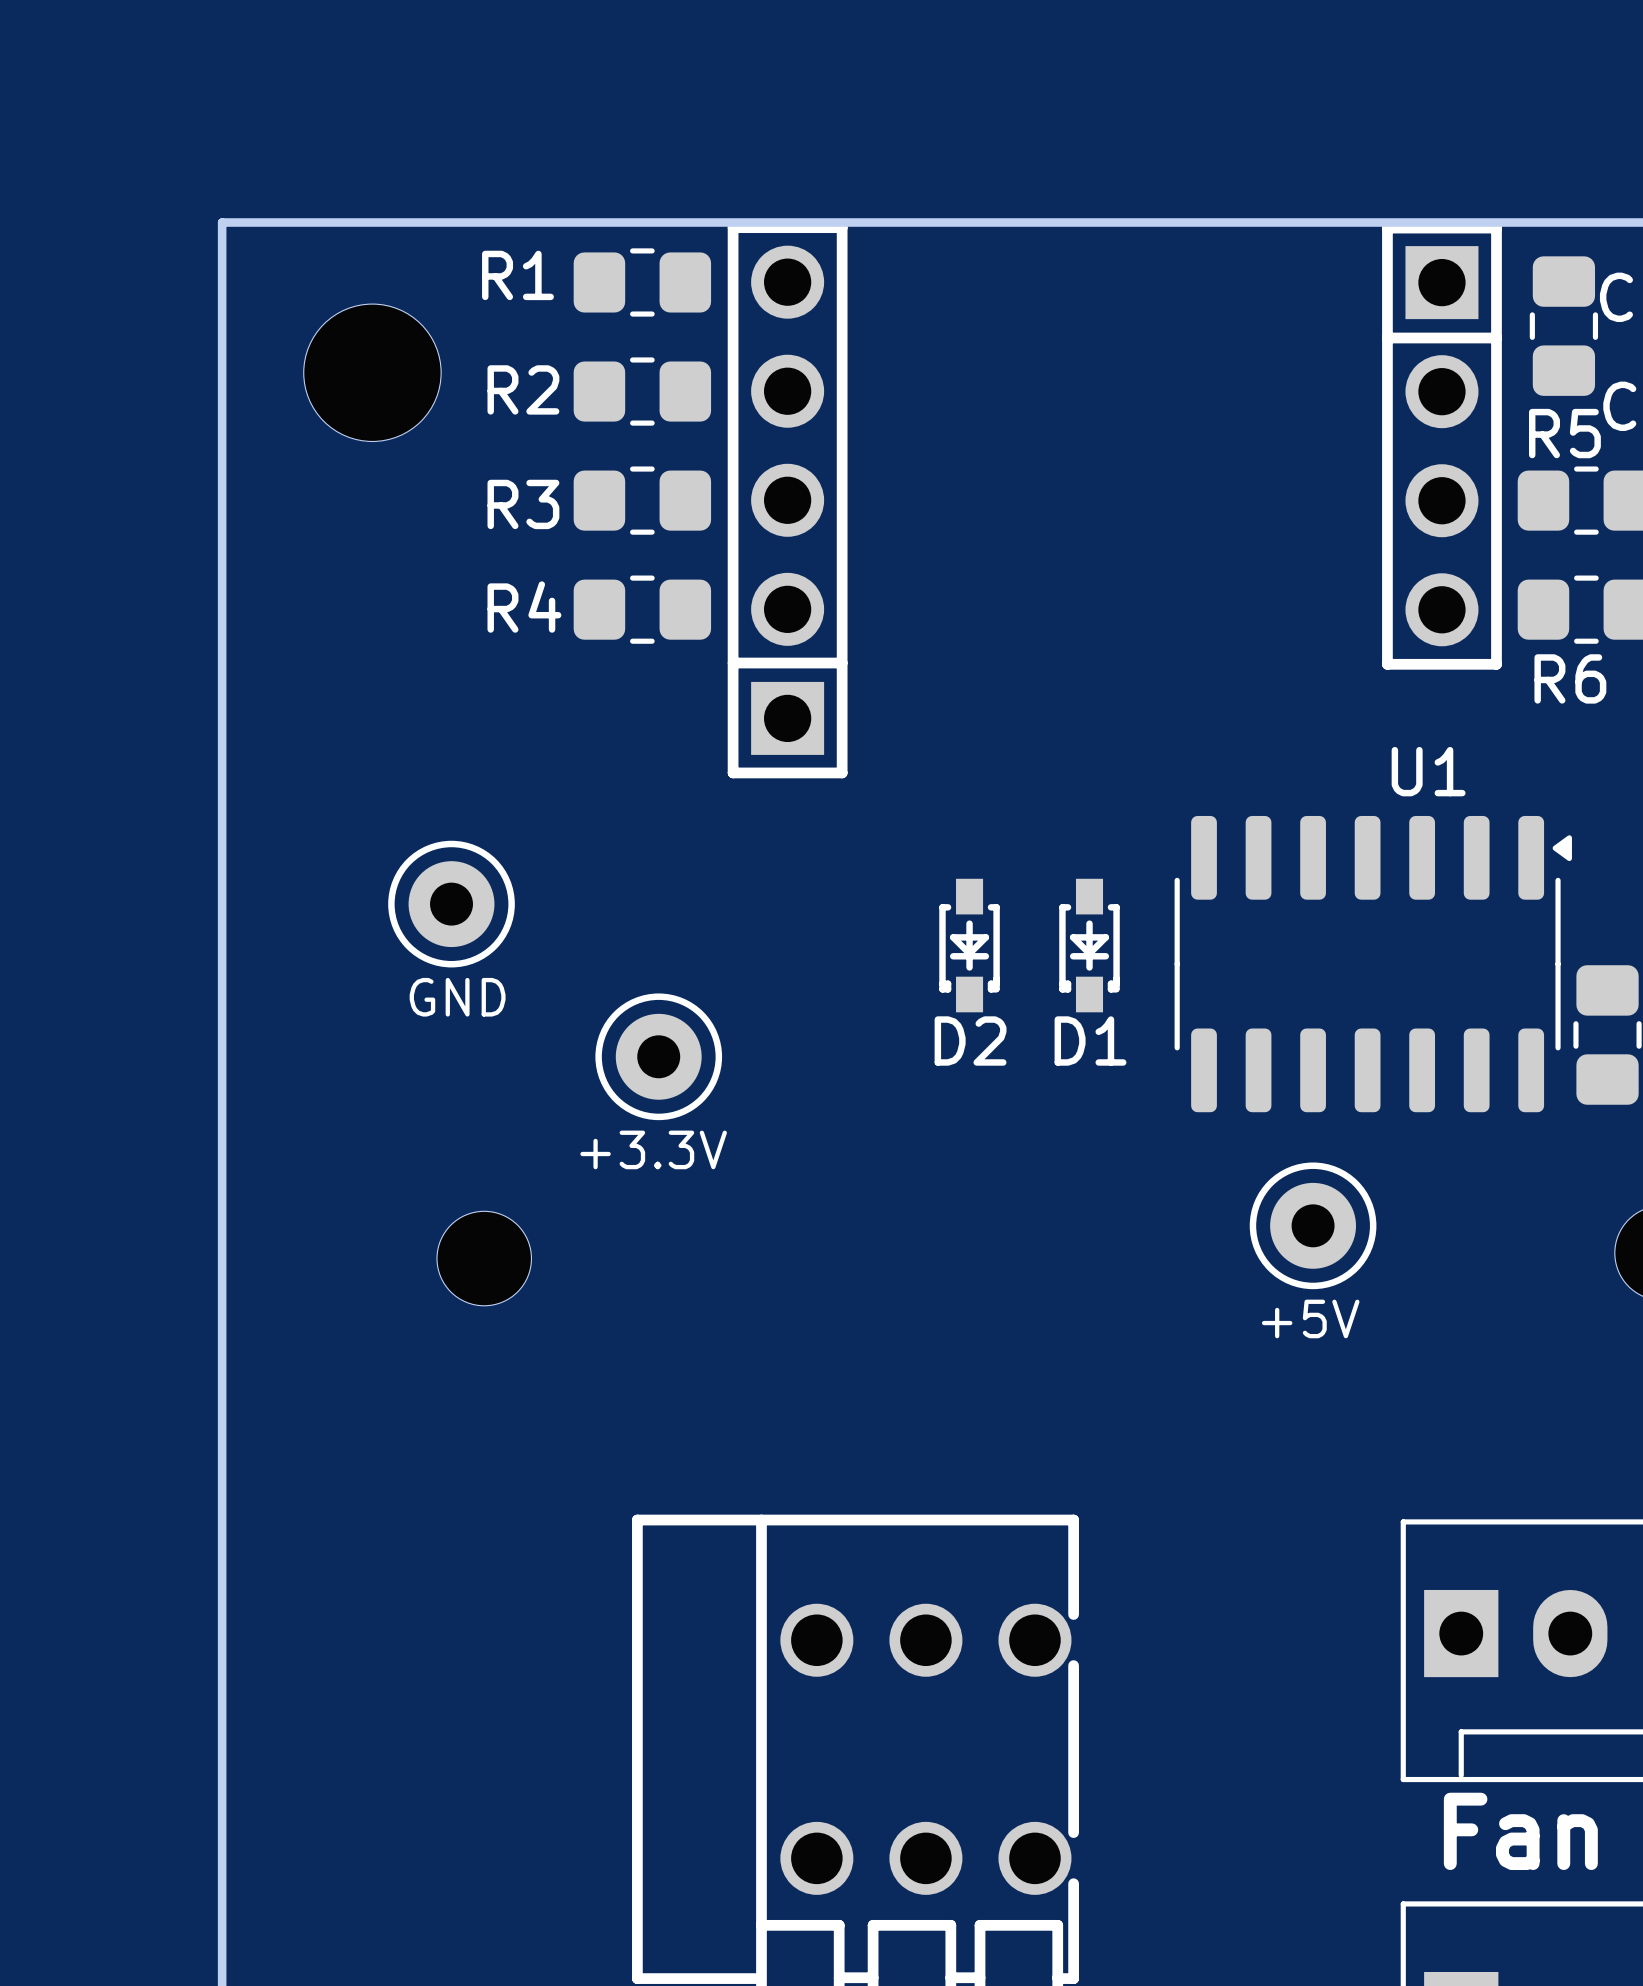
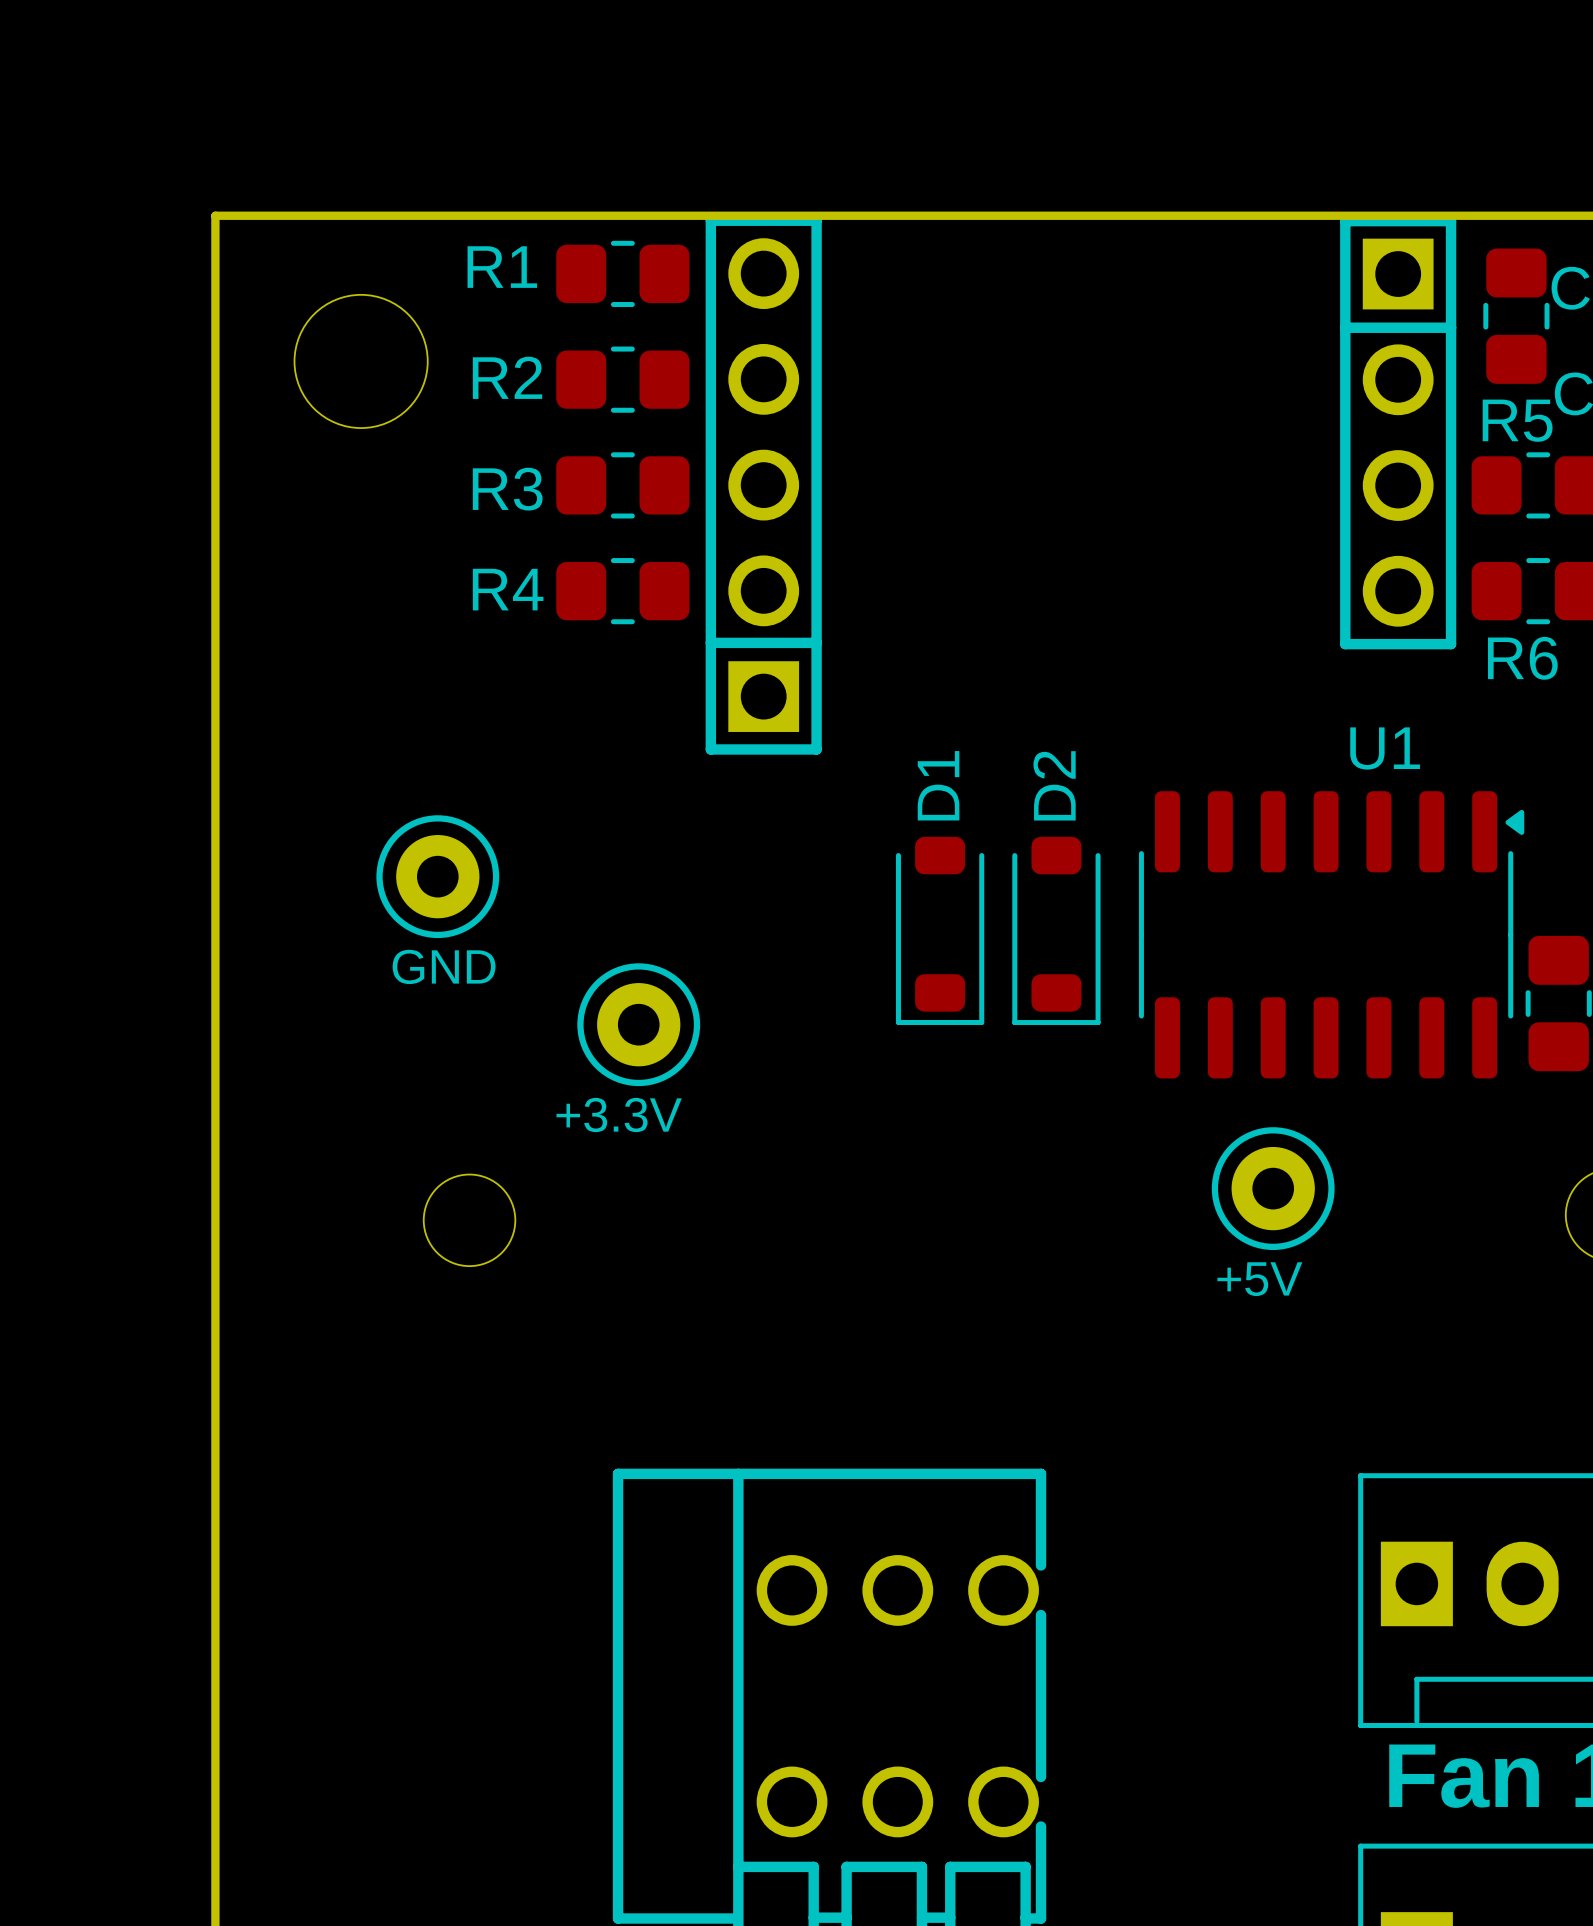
D2 footprint: [939, 878, 1000, 1013] -> [1012, 836, 1101, 1026]
D1 footprint: [1059, 878, 1120, 1013] -> [895, 836, 985, 1025]
D2 name position: D2 (970, 1041) -> D2 (1054, 785)
D1 name position: D1 (1090, 1041) -> D1 (938, 785)

